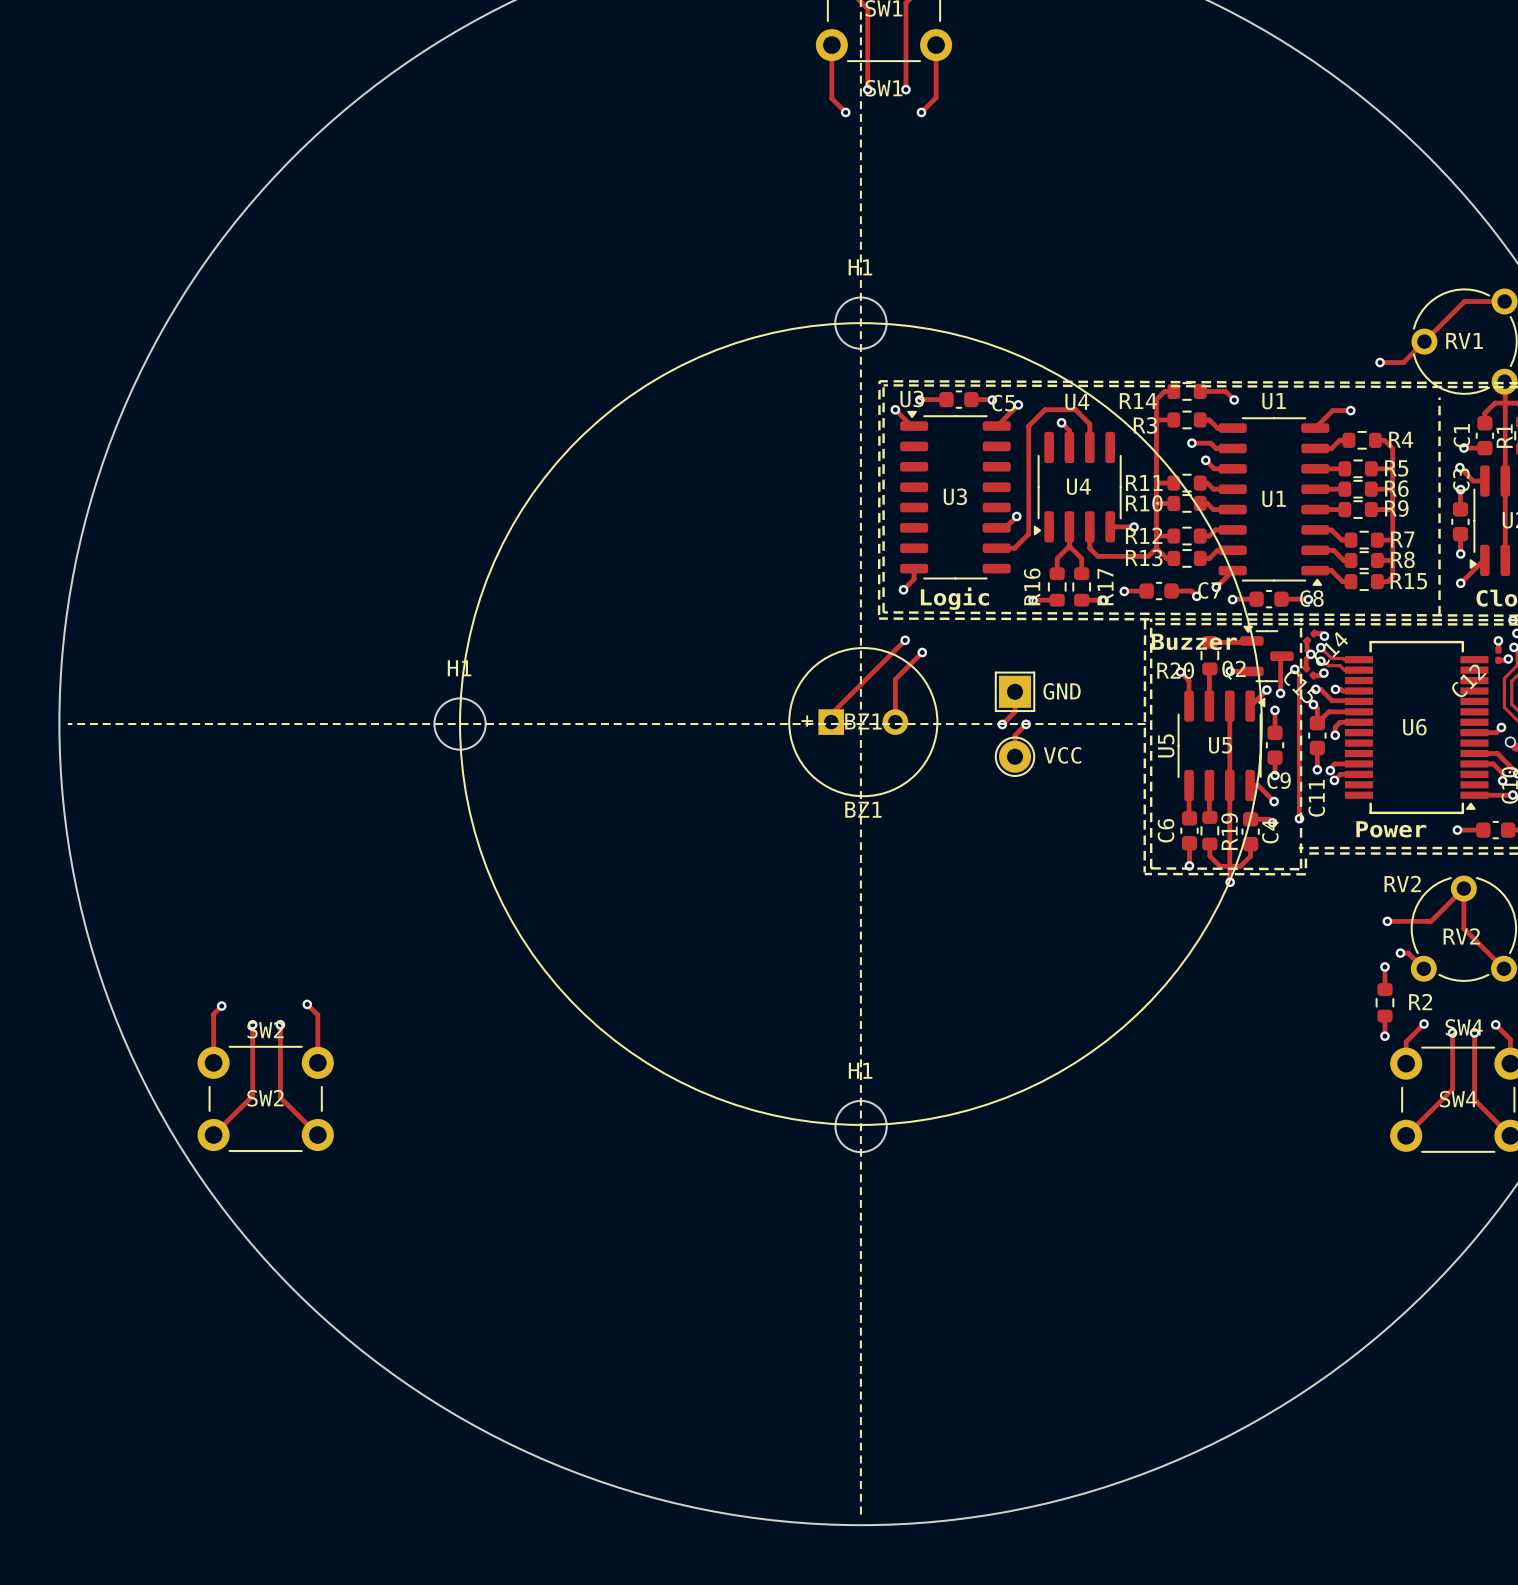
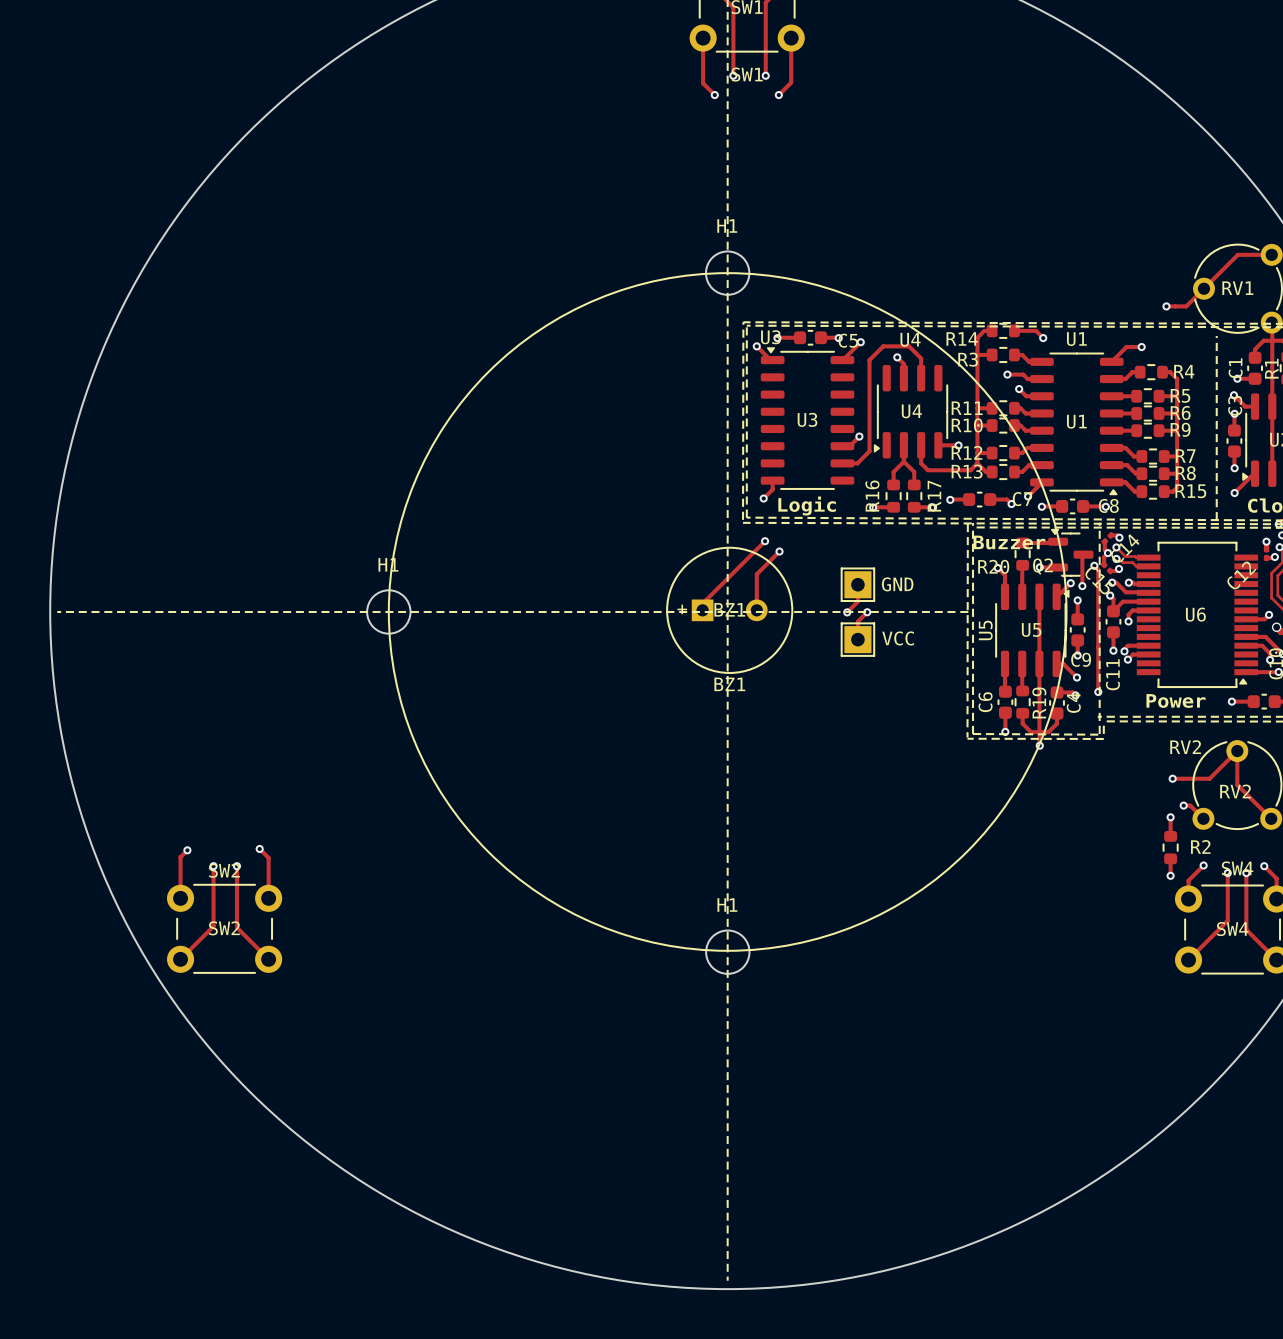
VCC footprint: [994, 736, 1036, 777] -> [840, 622, 876, 657]

